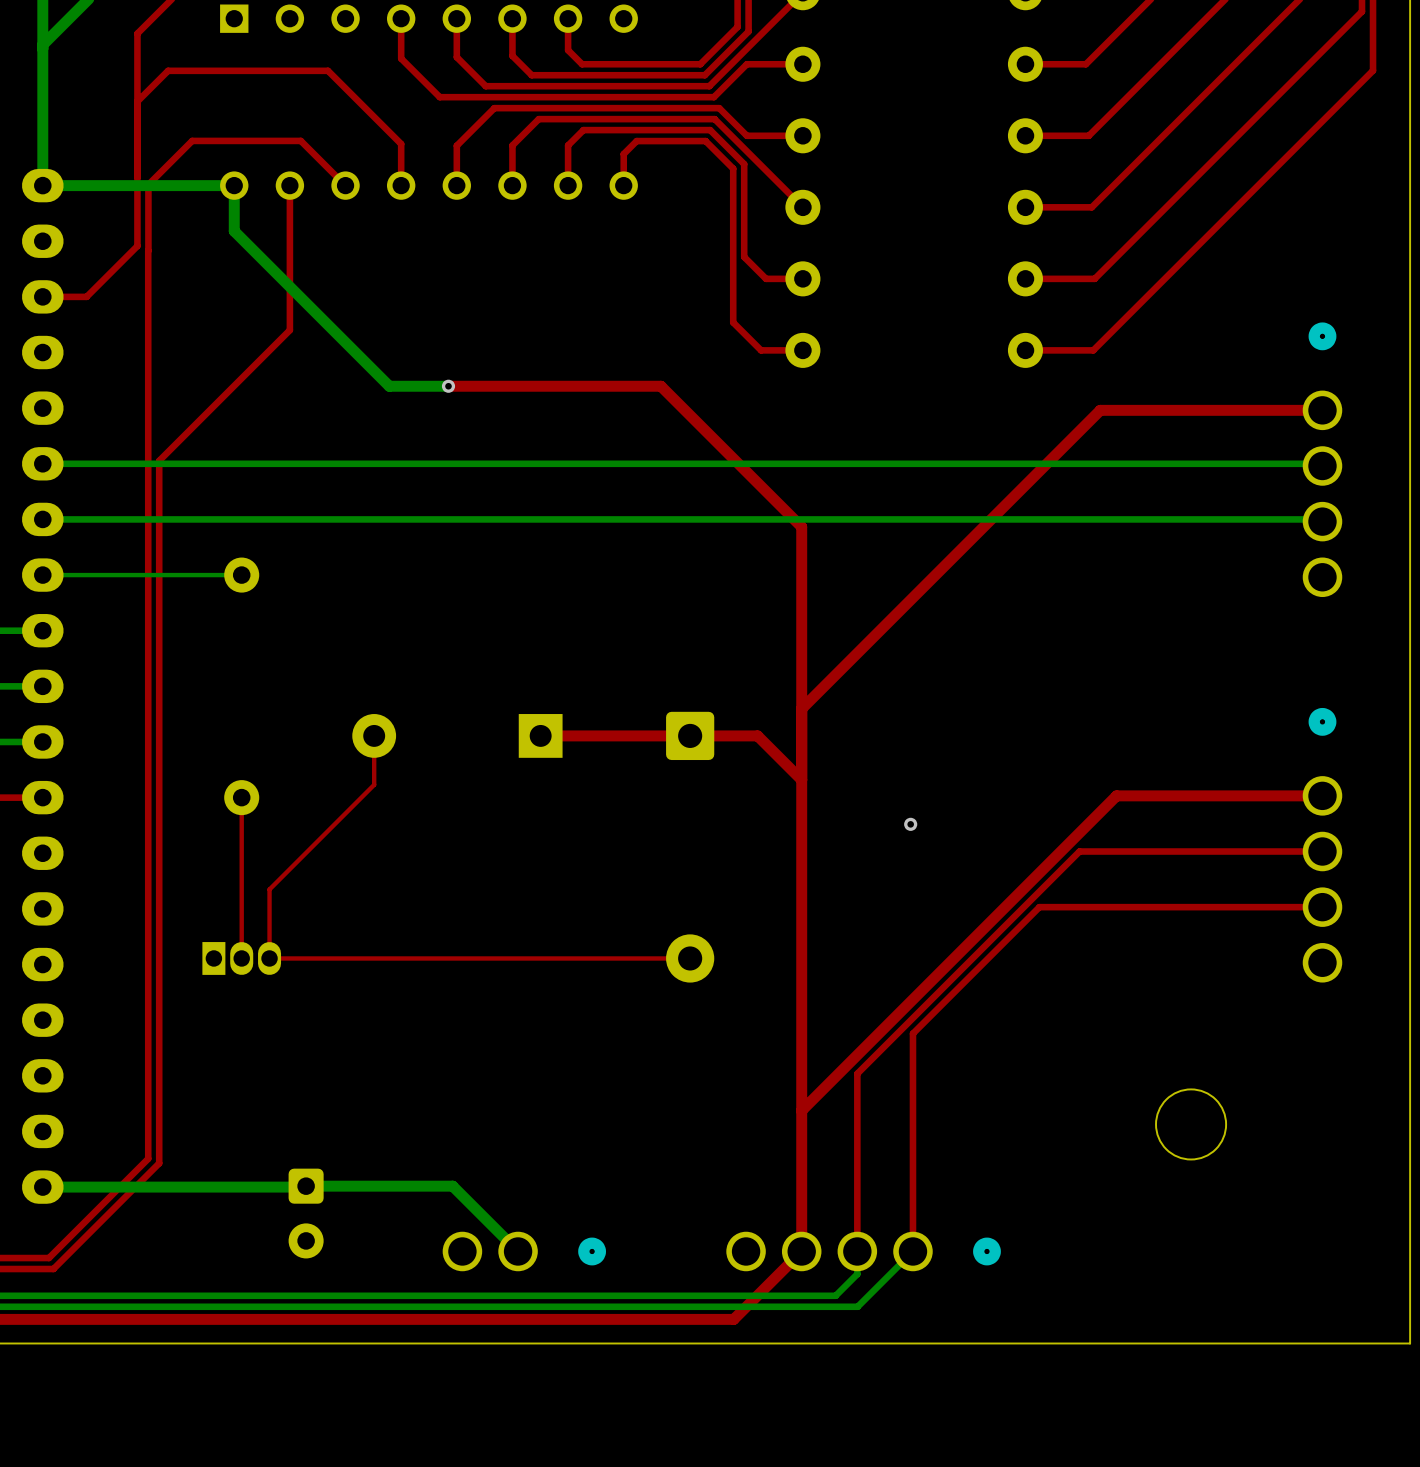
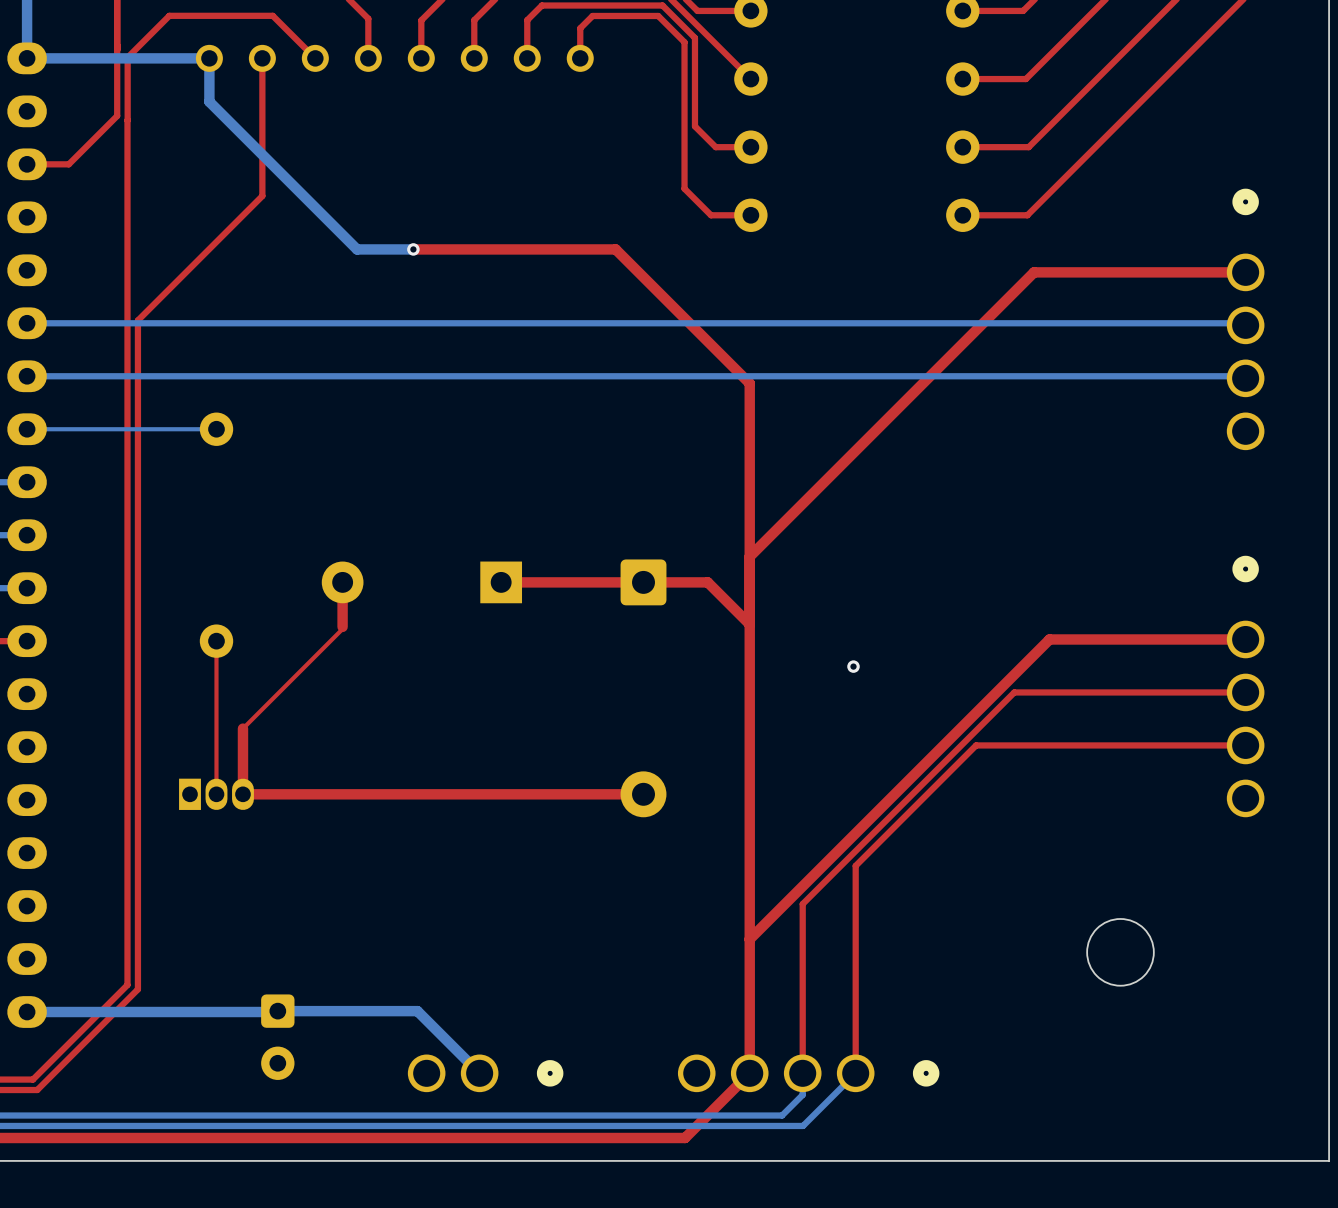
top track width: thin (374, 735) (374, 784) -> thick (342, 582) (342, 628)
top track width: thin (269, 889) (269, 958) (690, 958) -> thick (242, 728) (242, 794) (643, 794)

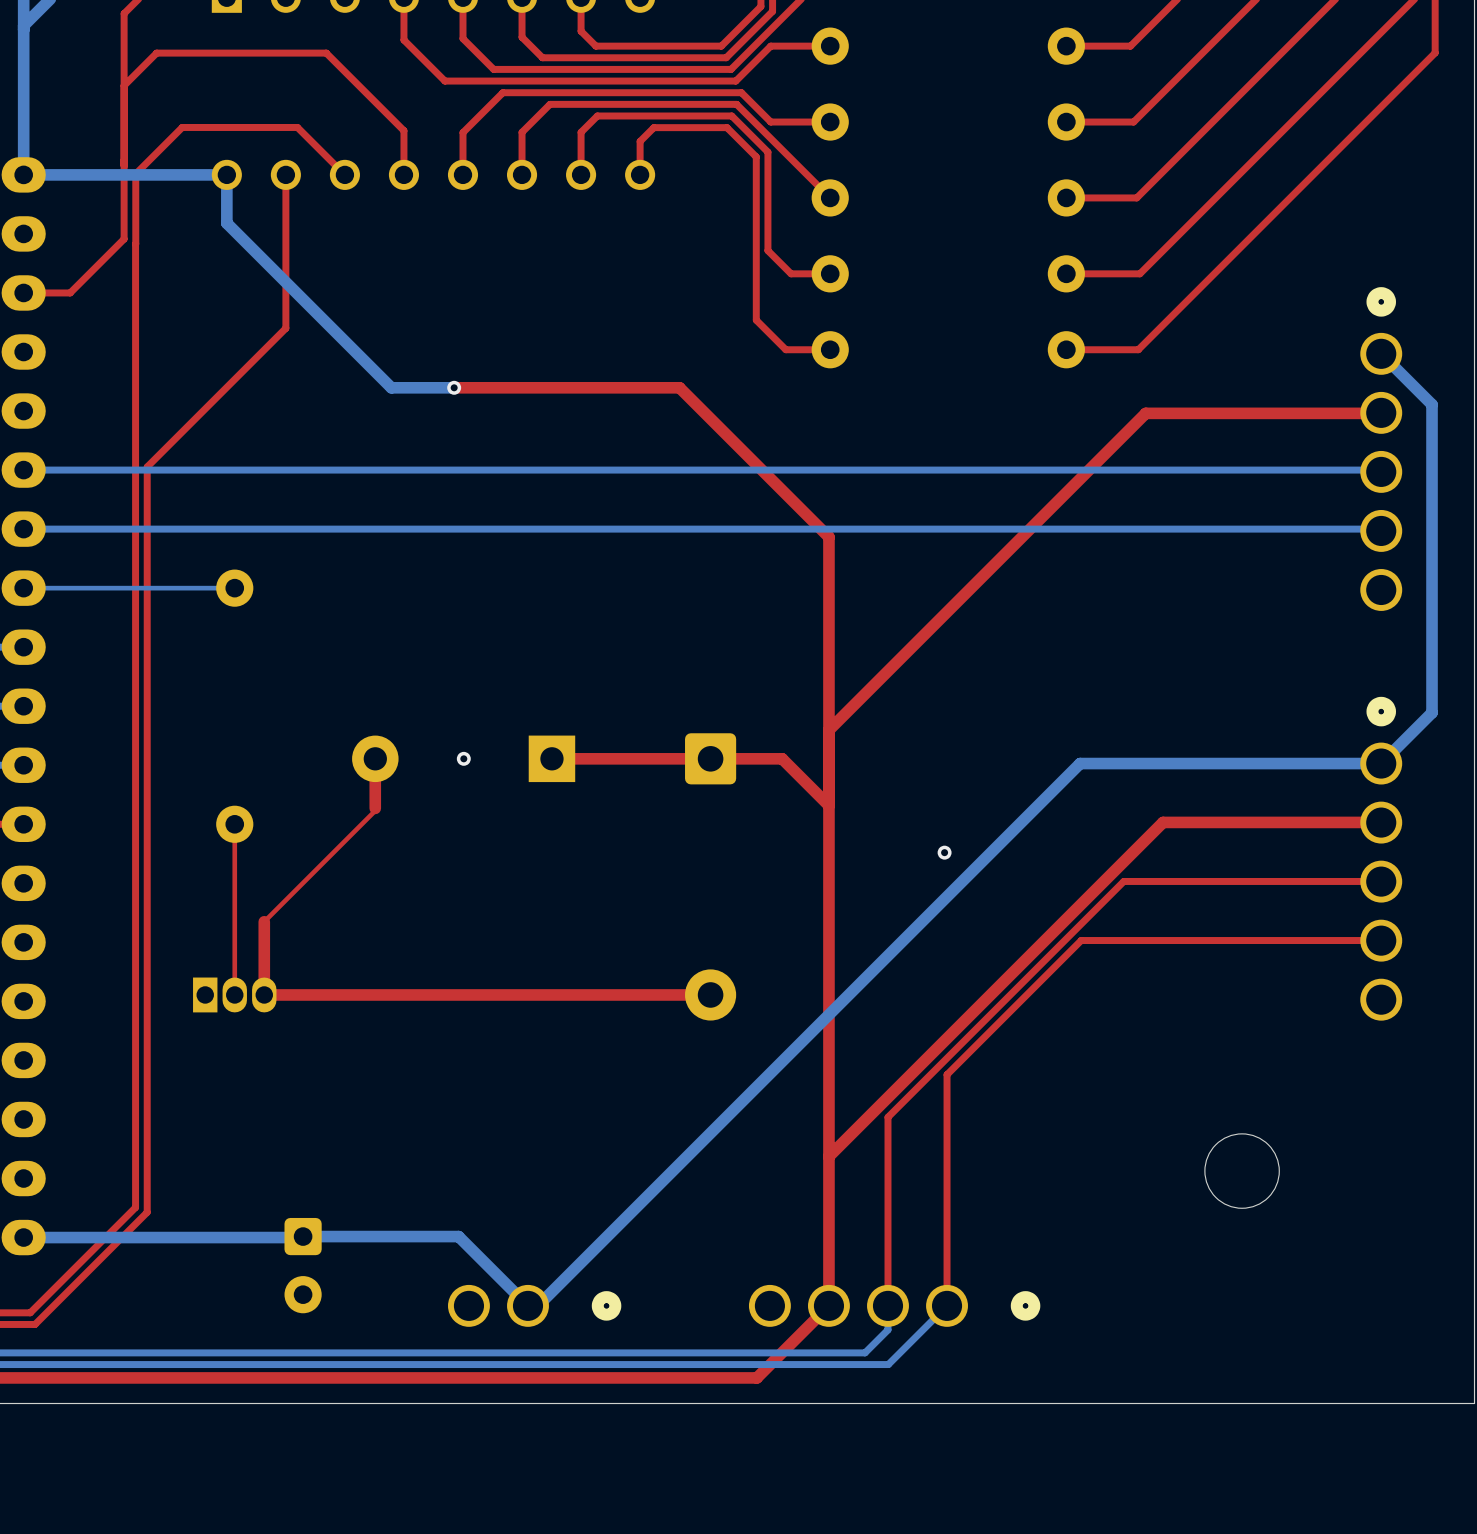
part footprint: [1226, 188, 1265, 451] -> [1360, 287, 1403, 611]
bottom track: none -> (1381, 353) (1432, 404) (1432, 712) (1381, 763) (1080, 763) (537, 1305) (527, 1305)
part footprint: [1226, 555, 1265, 818] -> [1360, 696, 1403, 1021]
via: none -> (463, 758)

